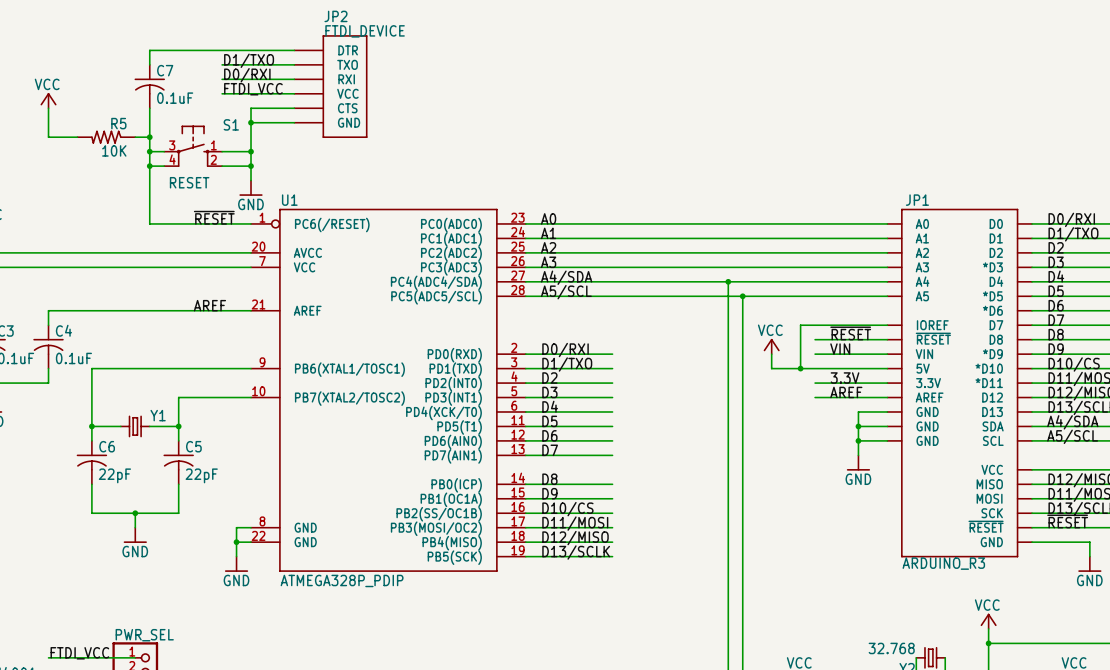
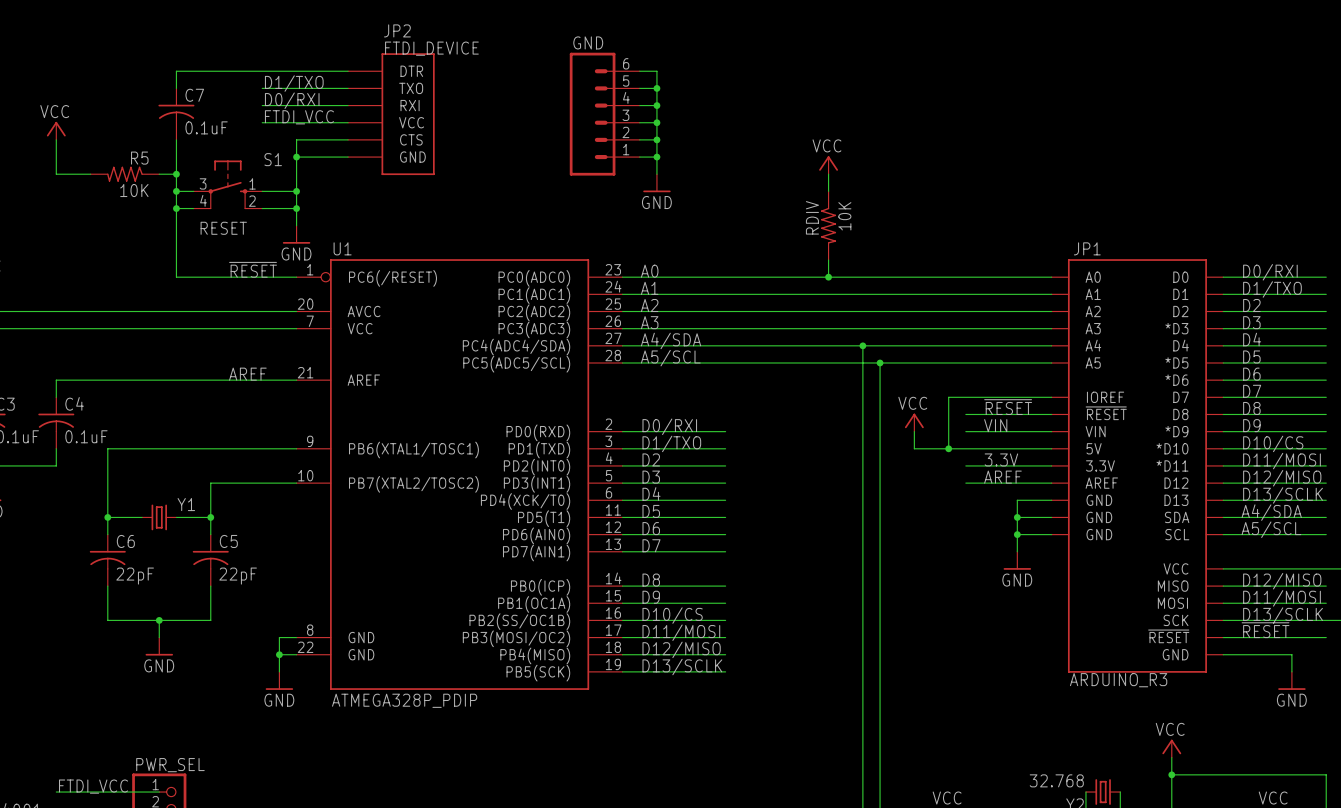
wire: none -> (639, 71) (656, 71) (656, 174)
wire: none -> (639, 88) (656, 88)
junction: none -> (656, 88)
wire: none -> (639, 105) (656, 105)
junction: none -> (656, 105)
GND: none -> (604, 114)
wire: none -> (639, 122) (656, 122)
junction: none -> (656, 122)
wire: none -> (639, 139) (656, 139)
junction: none -> (656, 139)
wire: none -> (639, 157) (656, 157)
junction: none -> (656, 157)
power symbol: none -> VCC (828, 165)
wire: none -> (828, 174) (828, 191)
power symbol: none -> GND (656, 183)
RDIV: none -> 10K (828, 225)
wire: none -> (828, 260) (828, 277)
junction: none -> (828, 277)

